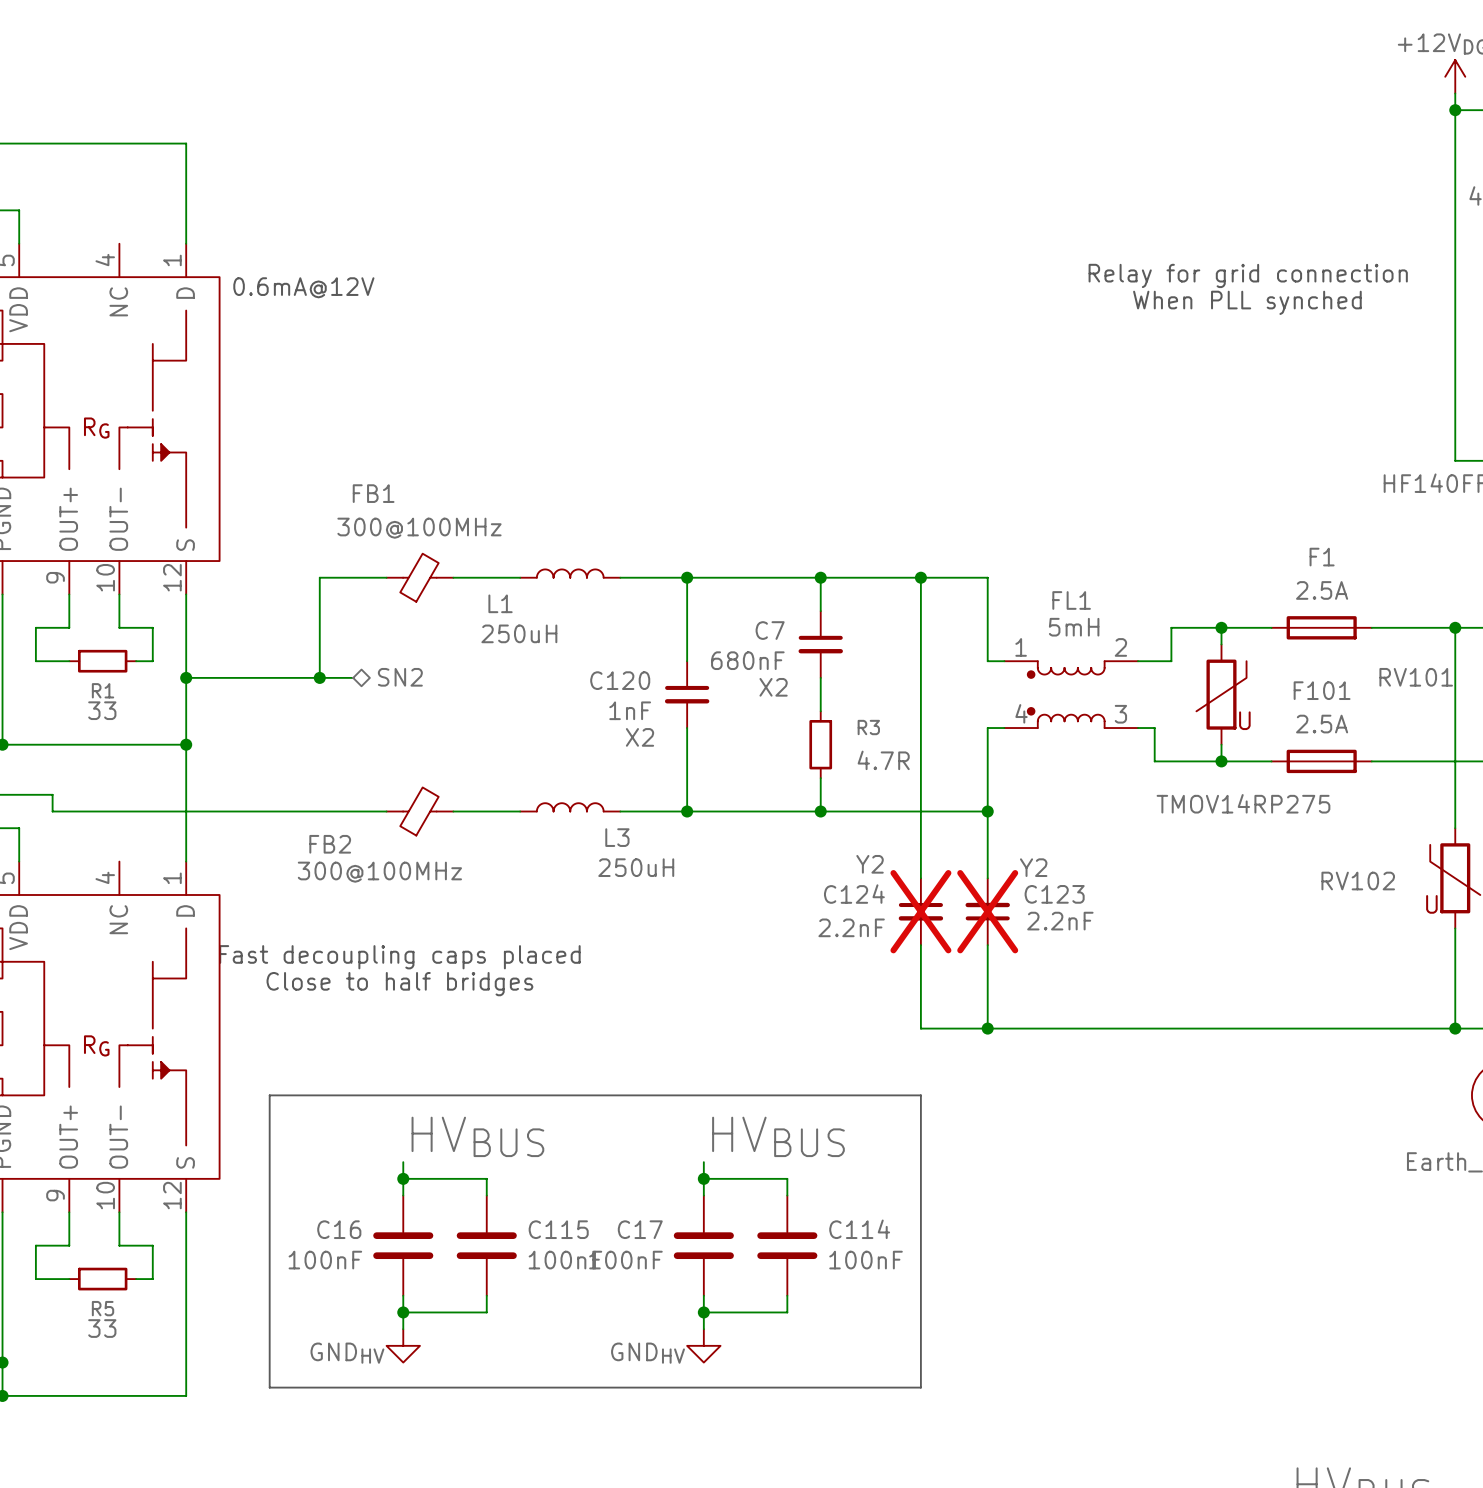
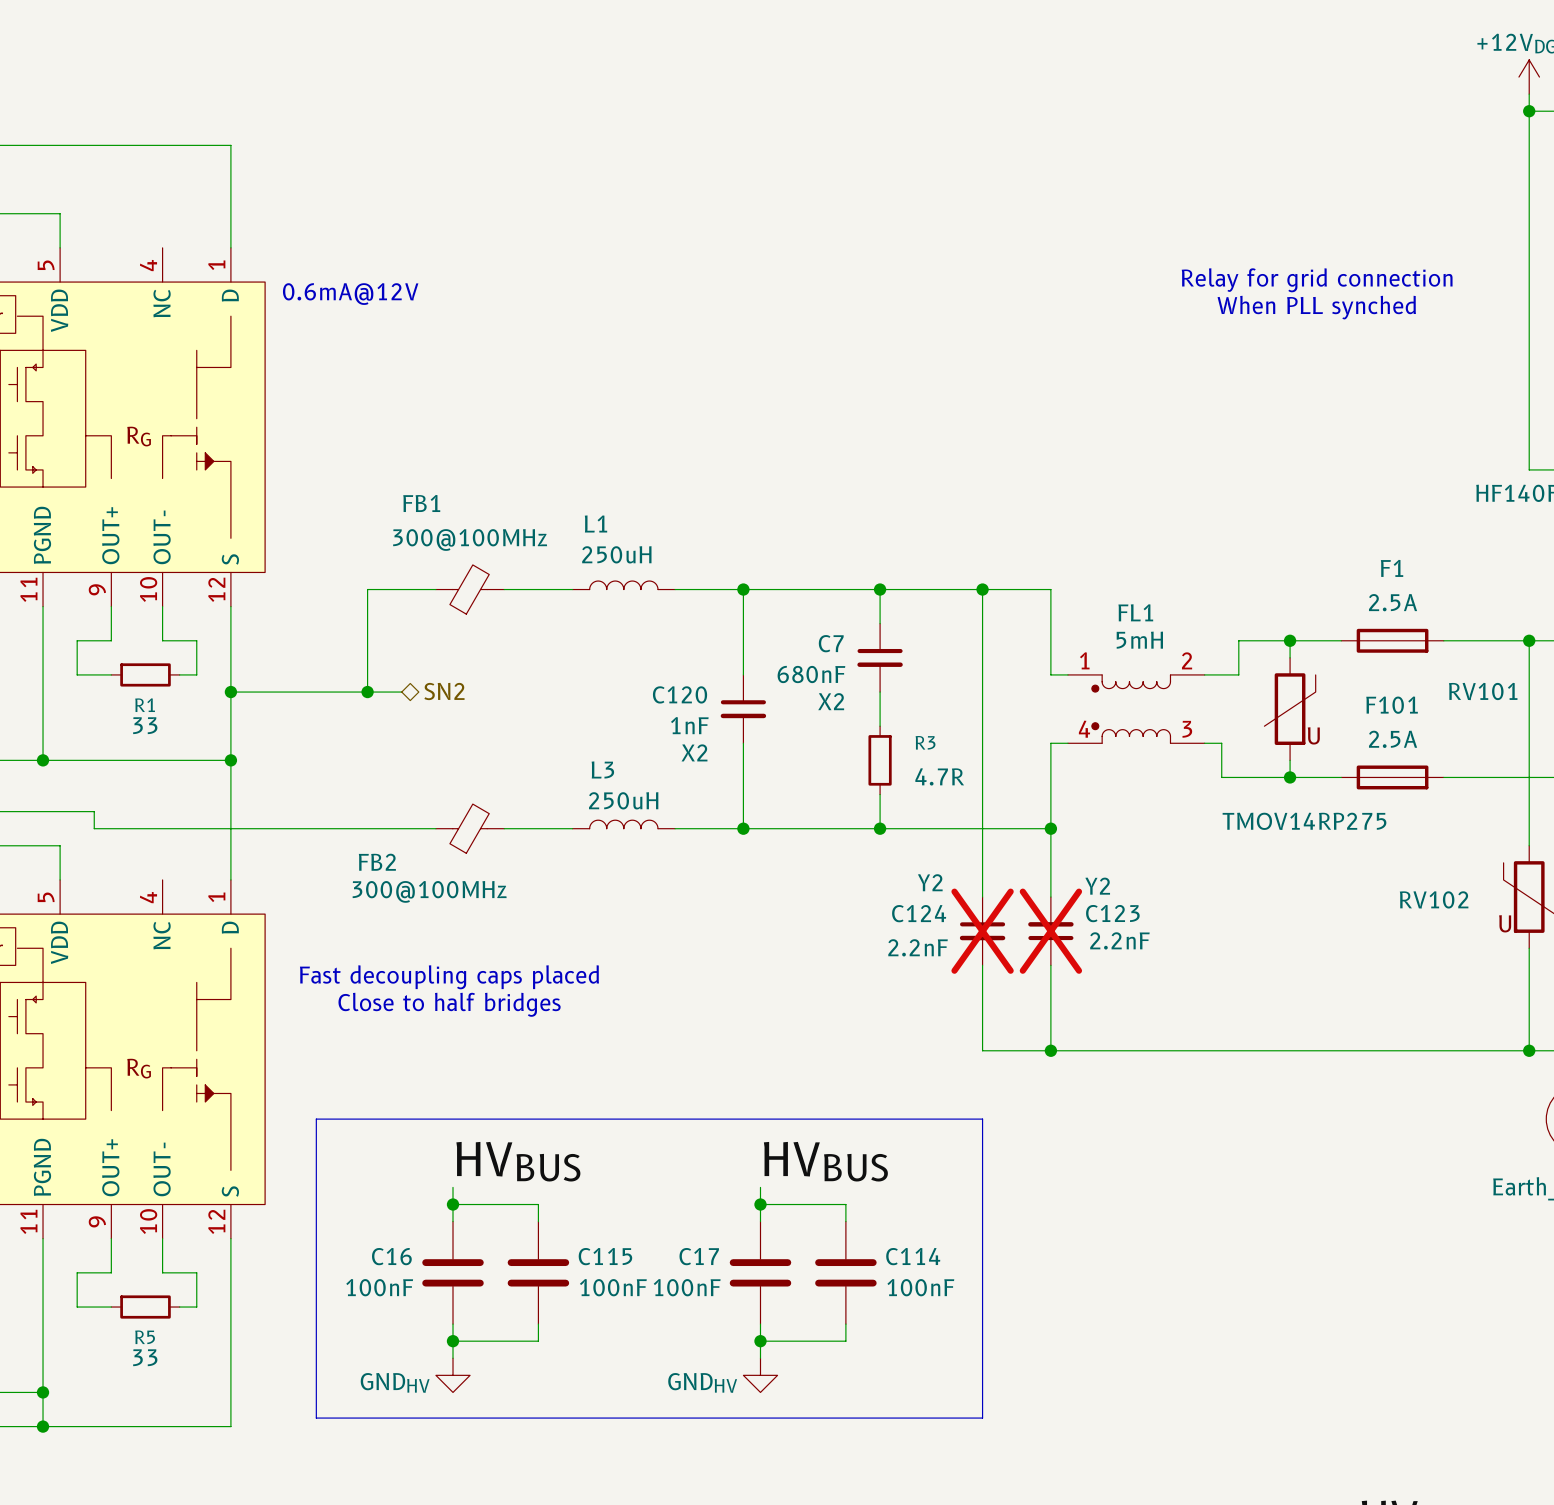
L1 name position: L1 (500, 603) -> L1 (595, 523)
L1 value position: 250uH (519, 633) -> 250uH (616, 554)
L3 name position: L3 (617, 837) -> L3 (602, 769)
L3 value position: 250uH (636, 867) -> 250uH (623, 800)

